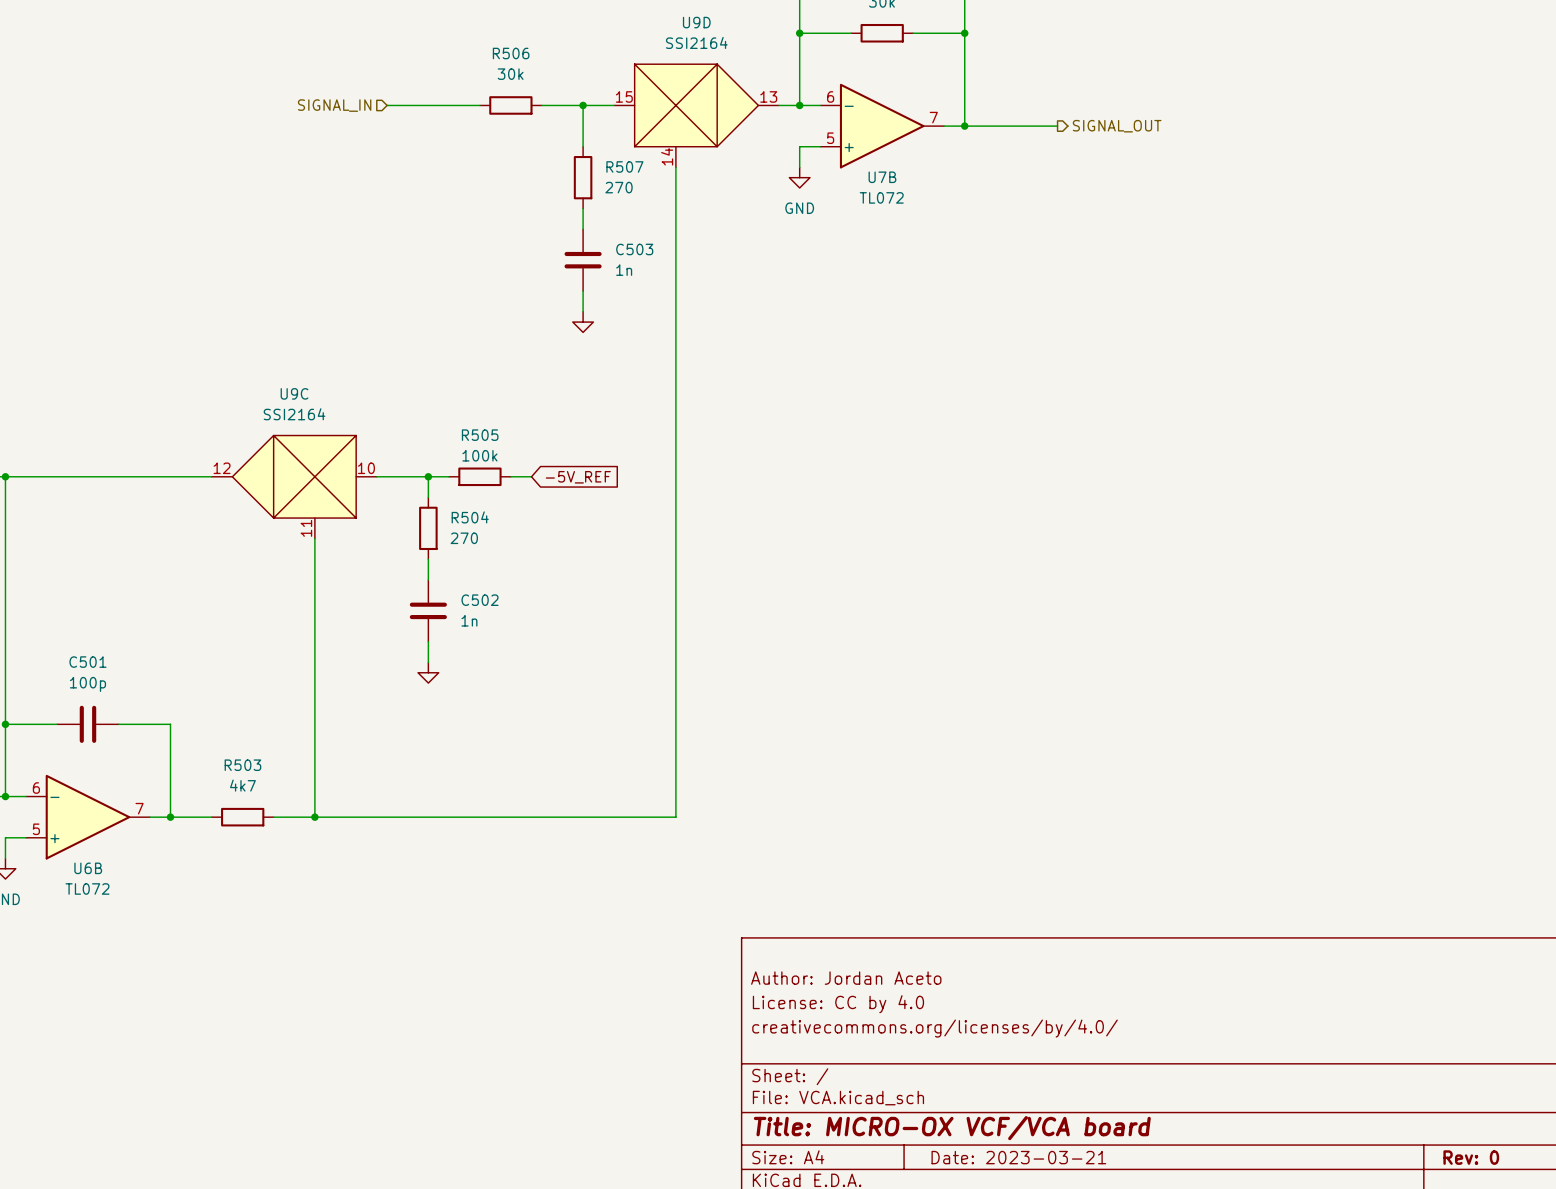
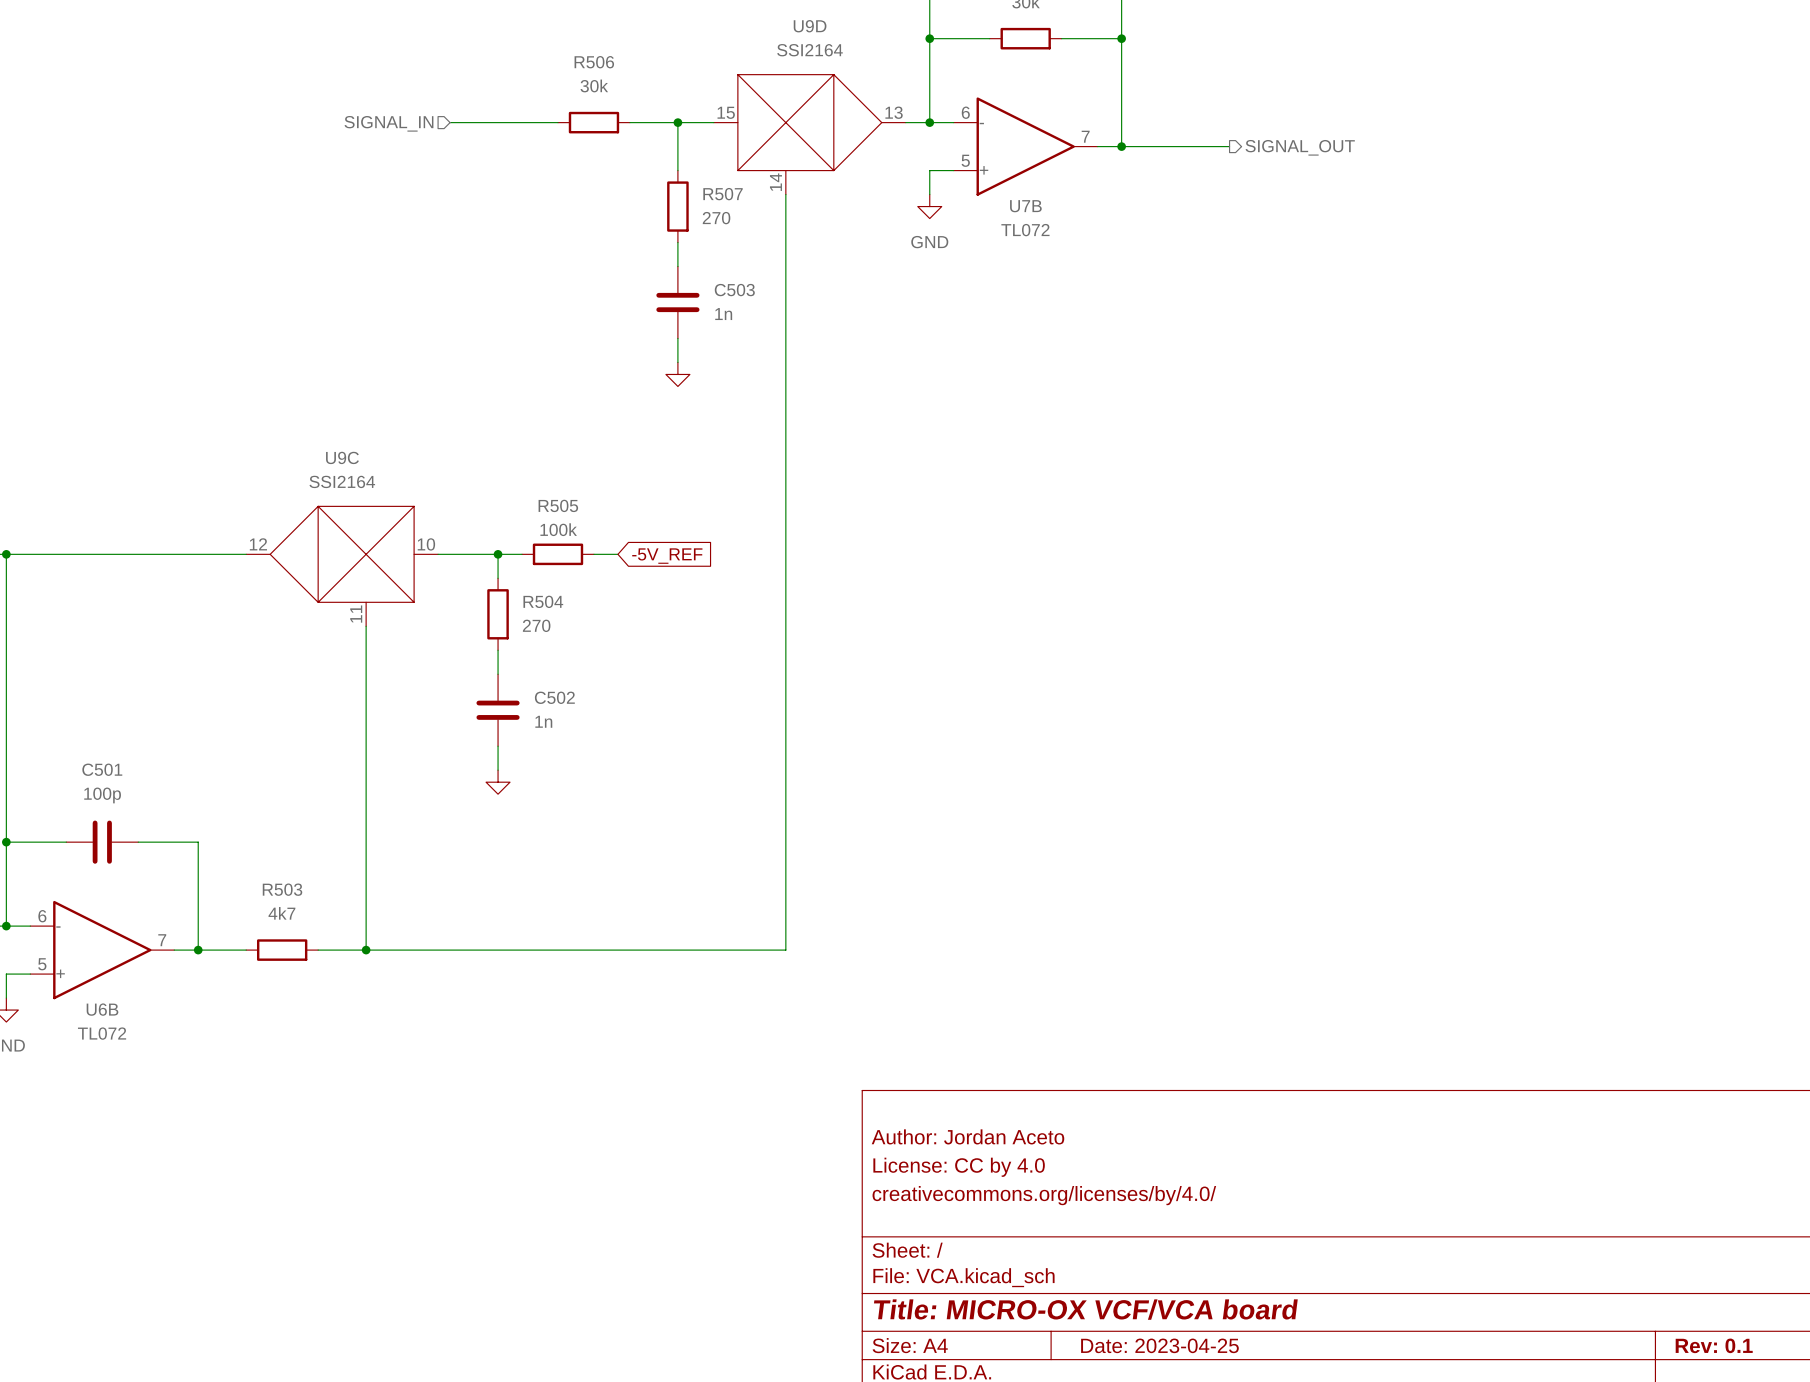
title block: Date: 2023-03-21 (1018, 1157) -> Date: 2023-04-25 (1159, 1345)
title block: Rev: 0 (1471, 1157) -> Rev: 0.1 (1714, 1345)

